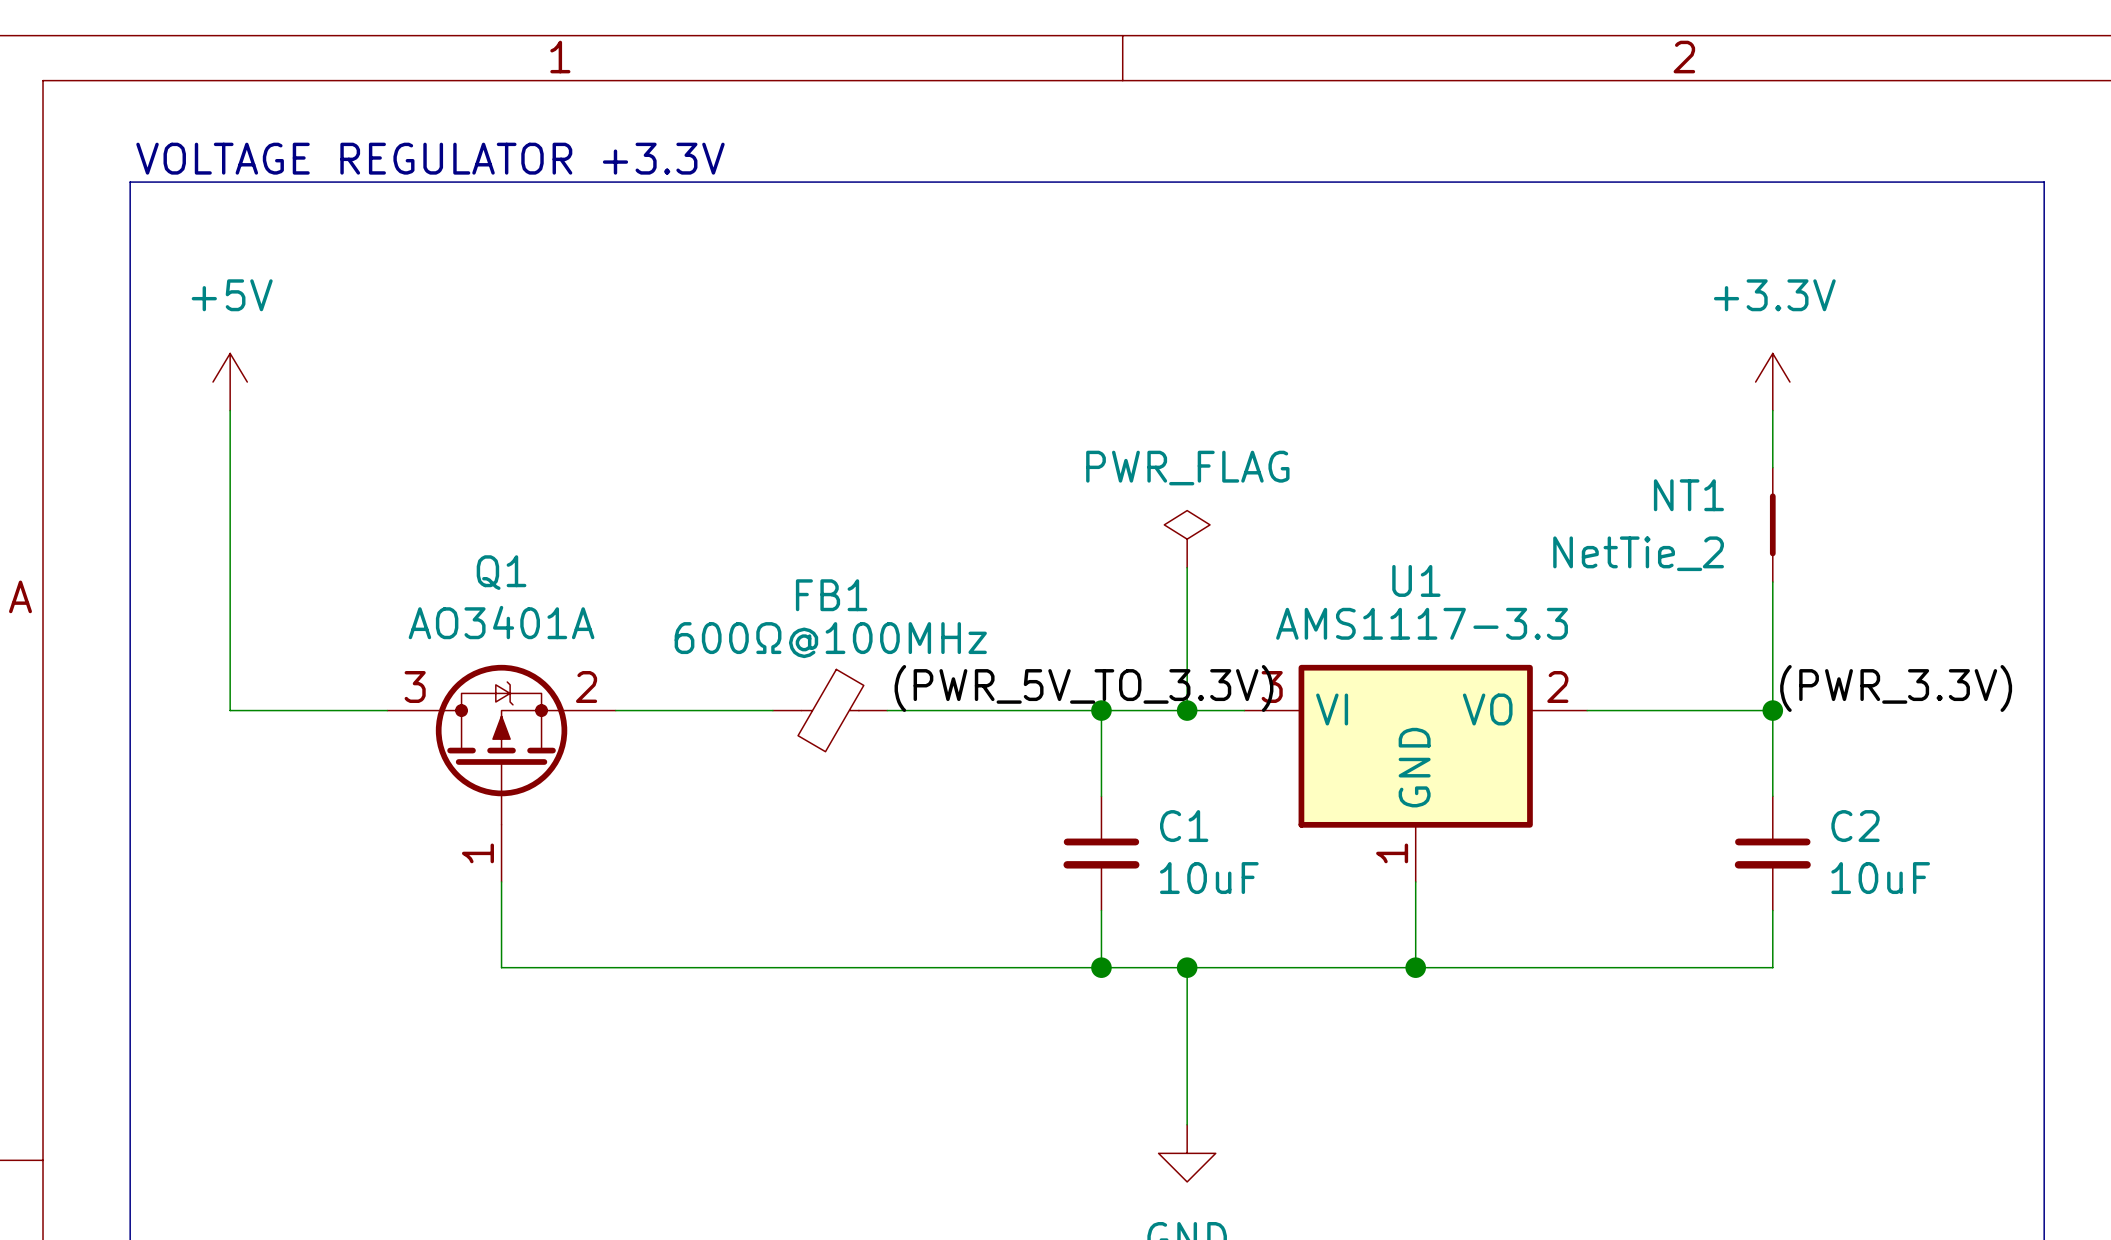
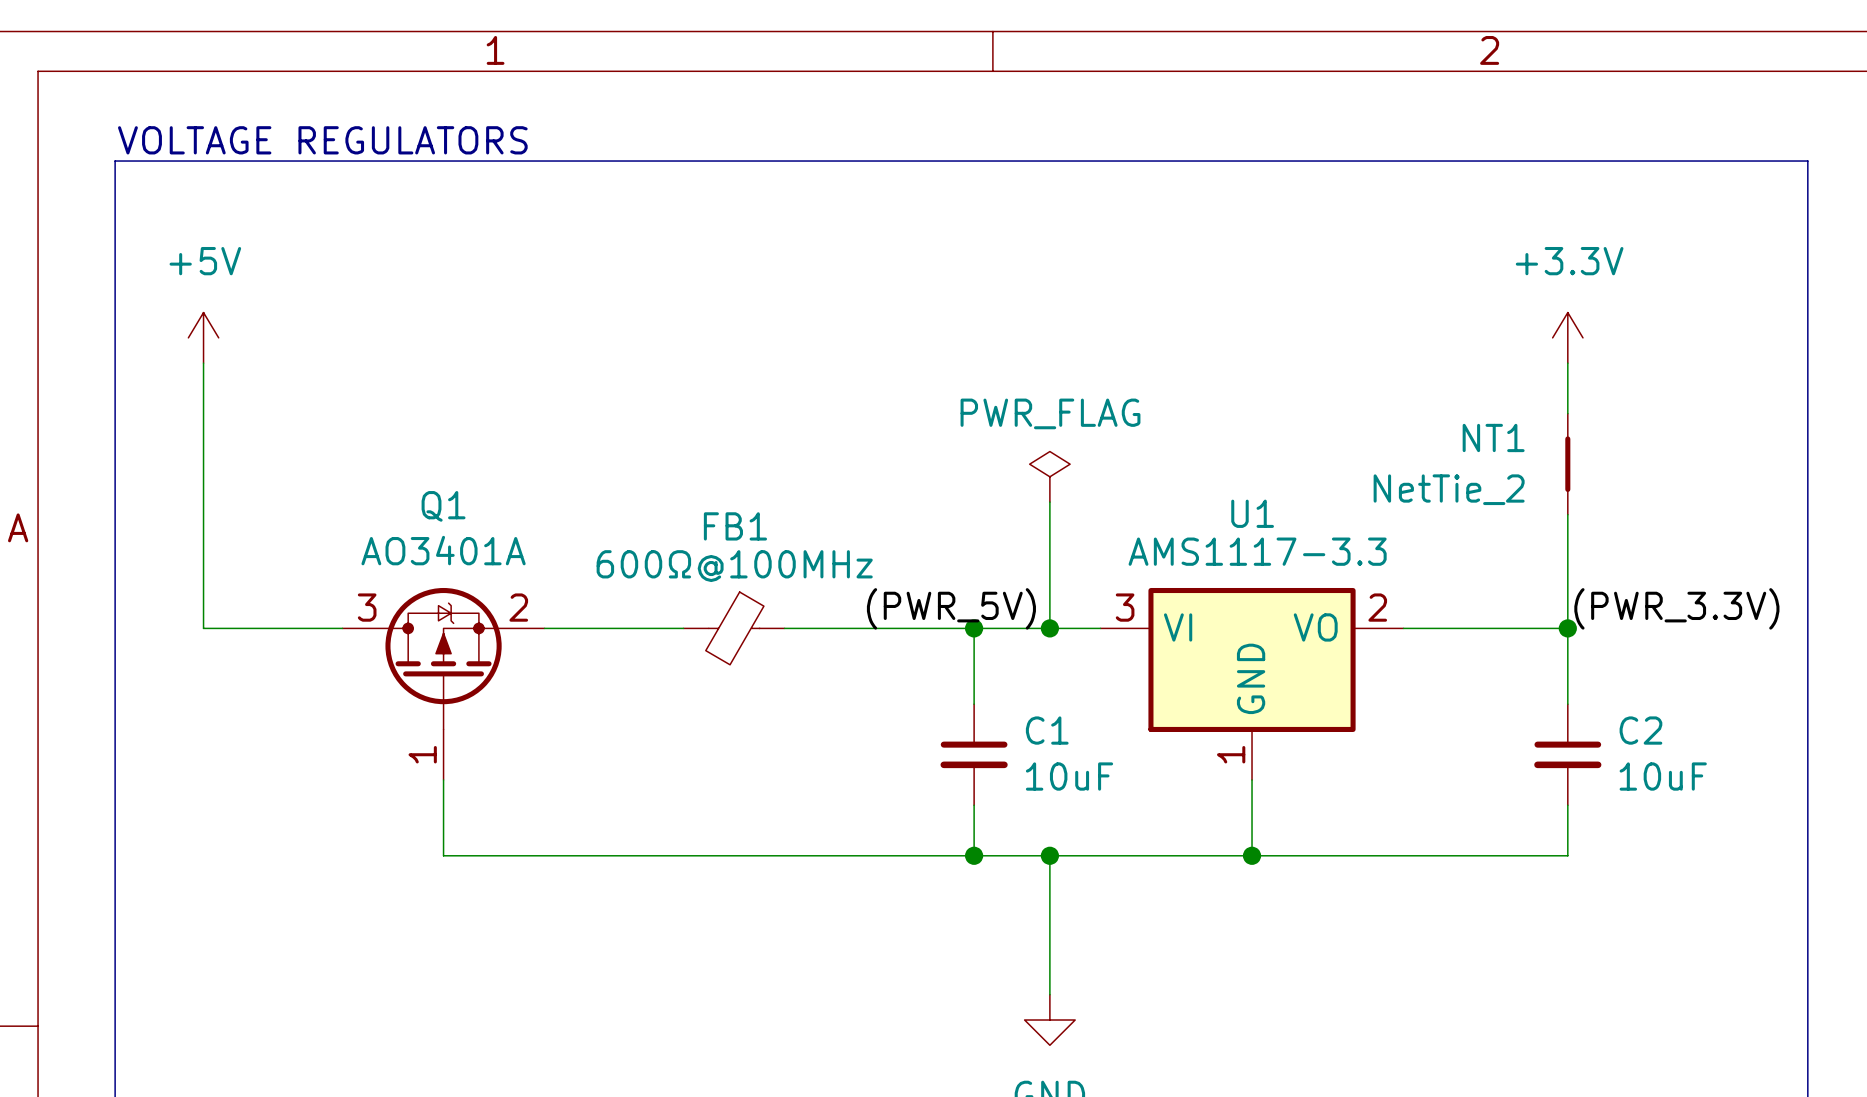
text: VOLTAGE REGULATOR +3.3V (430, 158) -> VOLTAGE REGULATORS (322, 140)
label: (PWR_5V_TO_3.3V) (1083, 688) -> (PWR_5V) (951, 608)

